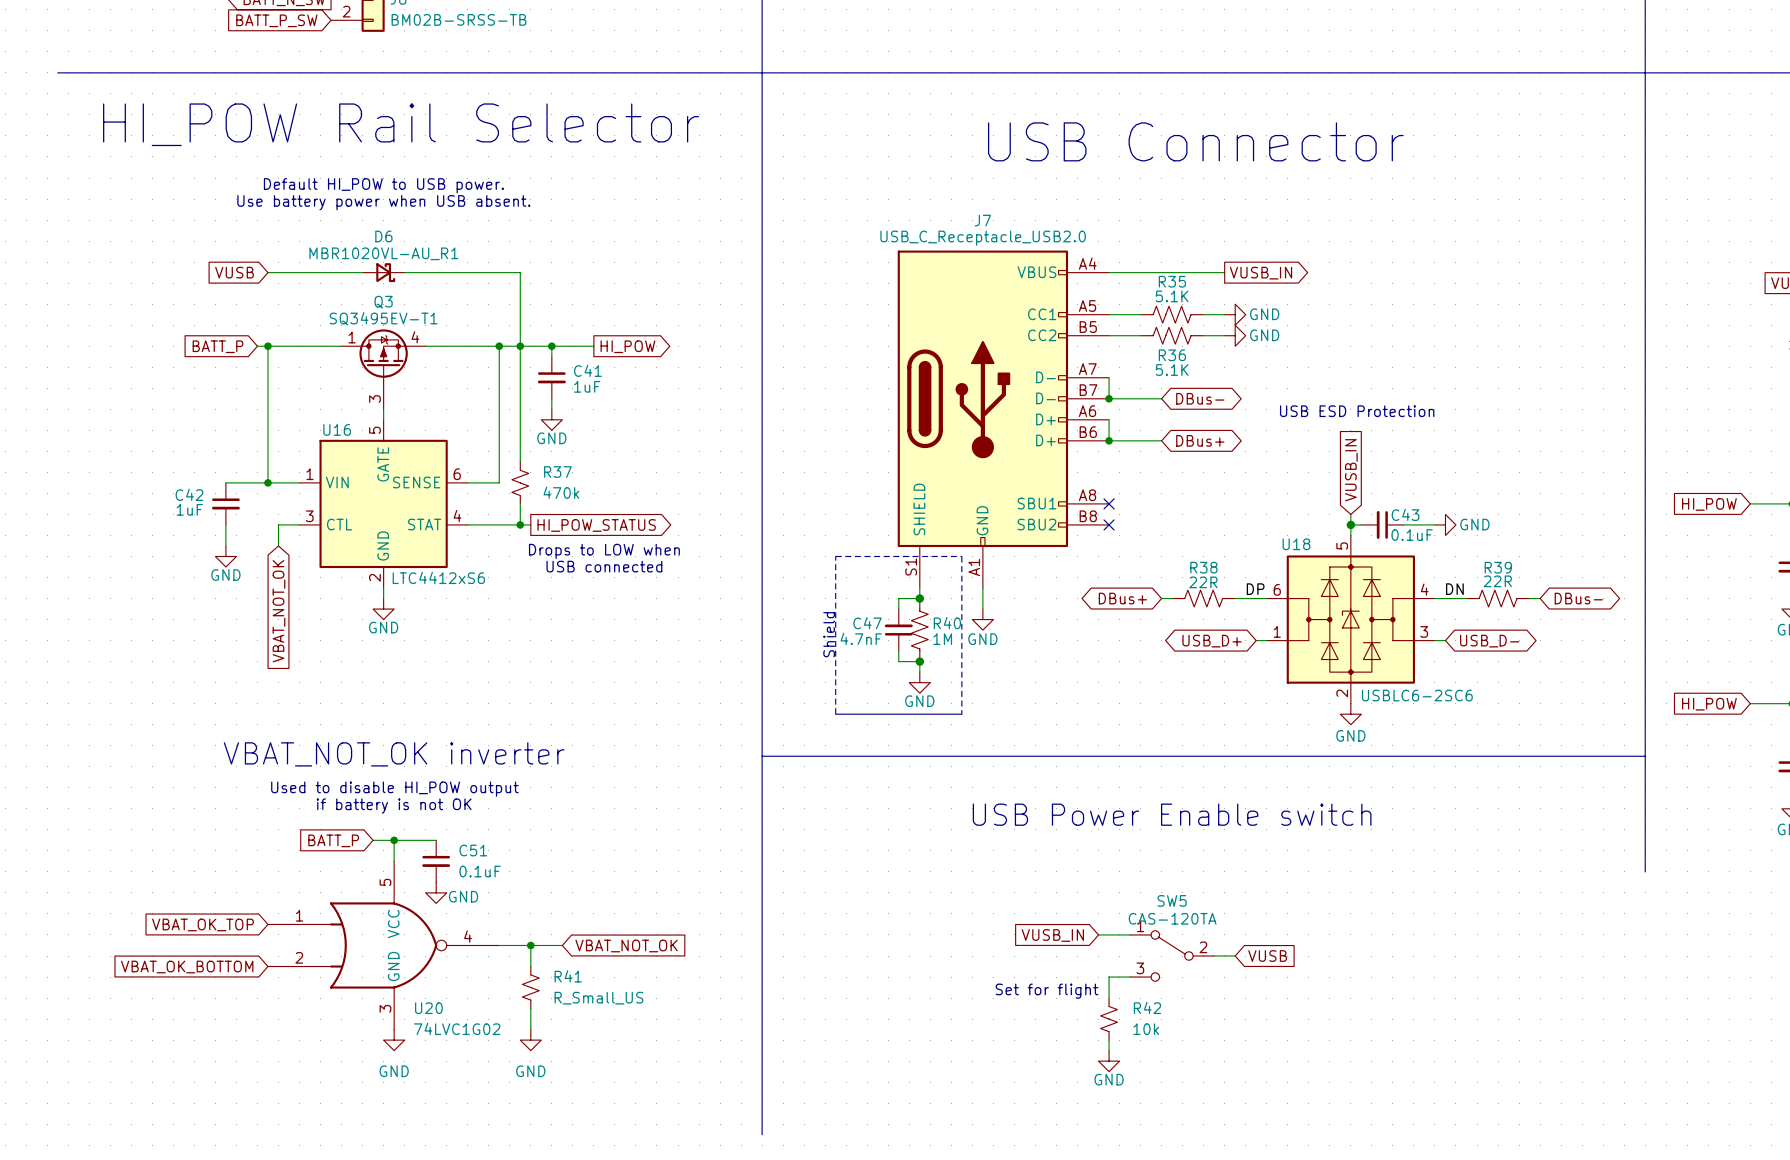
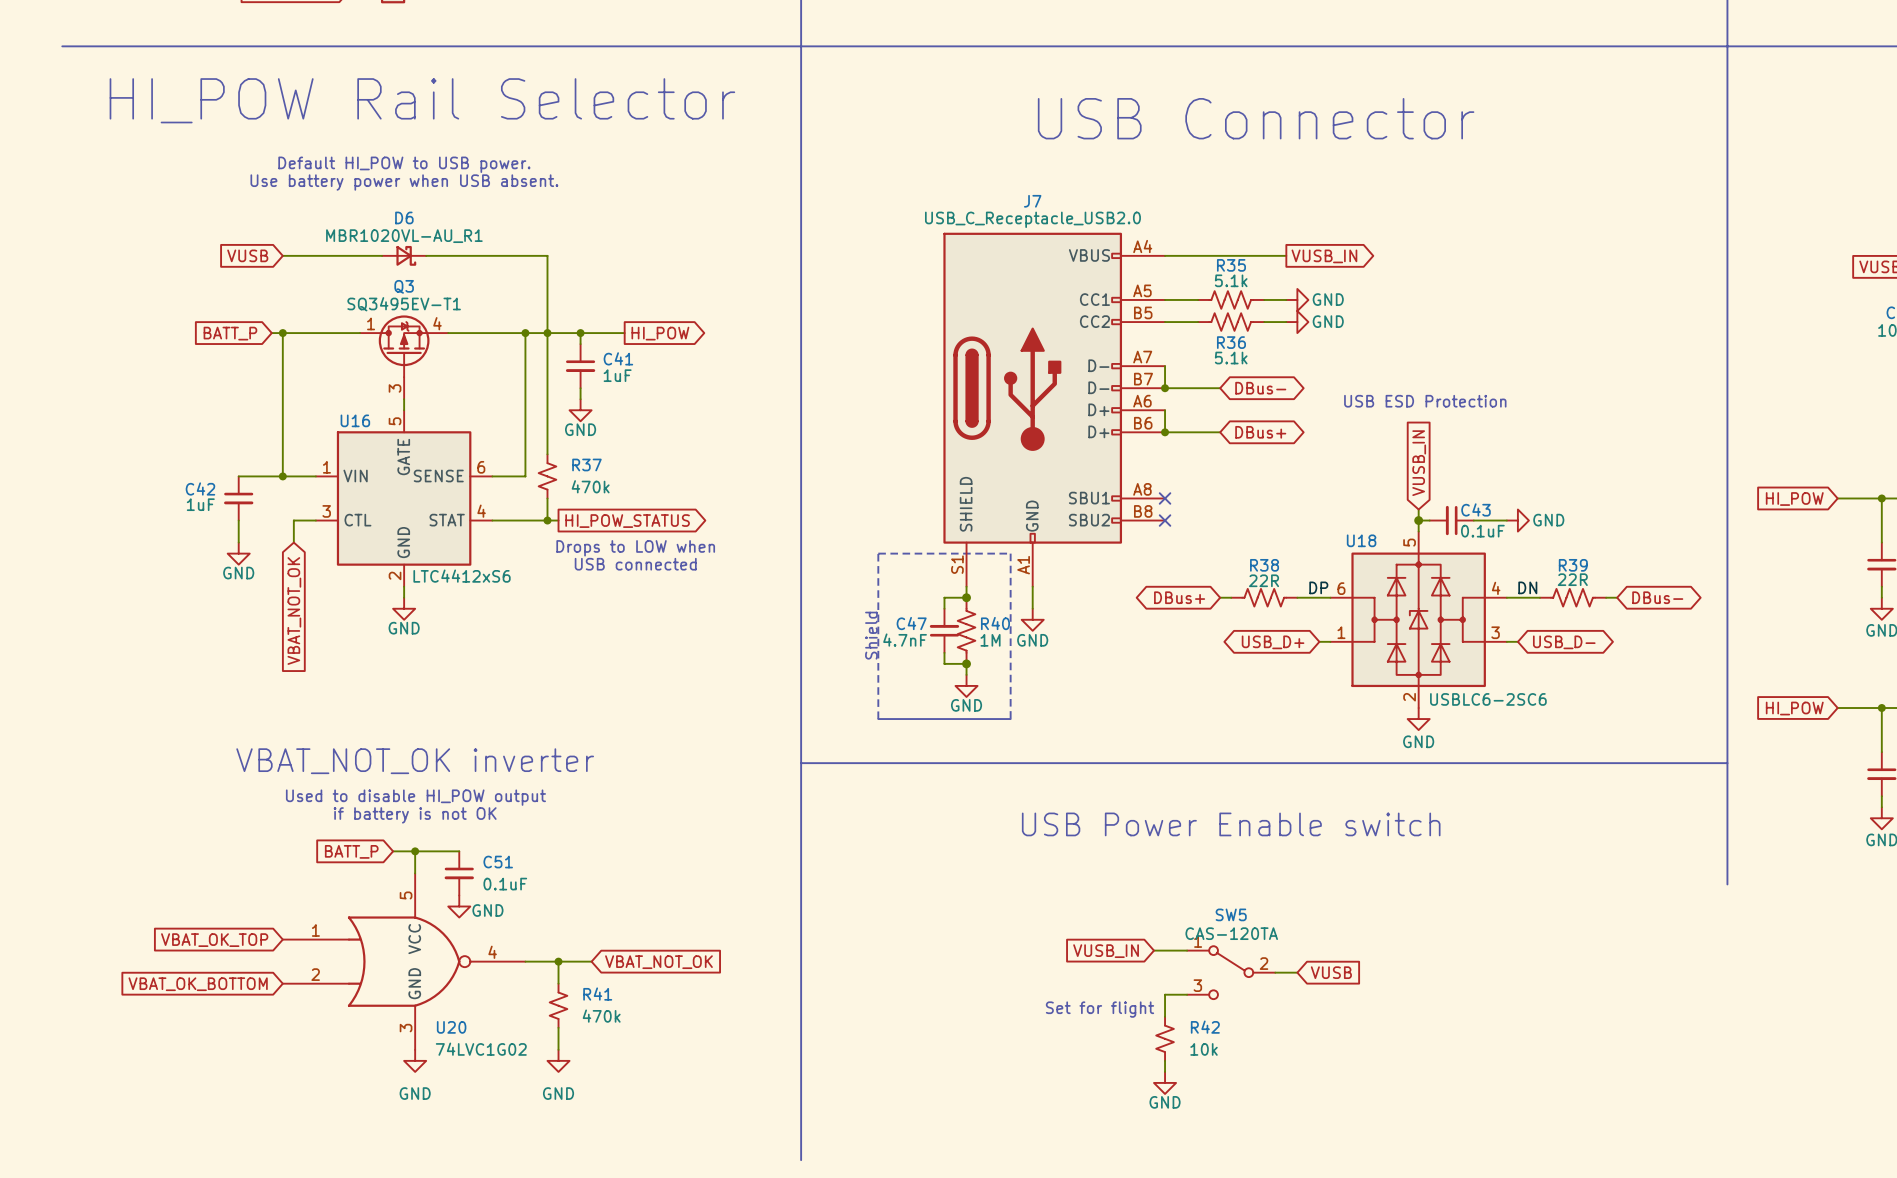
R35 value: 5.1K (1172, 296) -> 5.1k (1231, 280)
R36 value: 5.1K (1172, 370) -> 5.1k (1231, 358)
R41 value: R_Small_US (598, 998) -> 470k (601, 1016)

